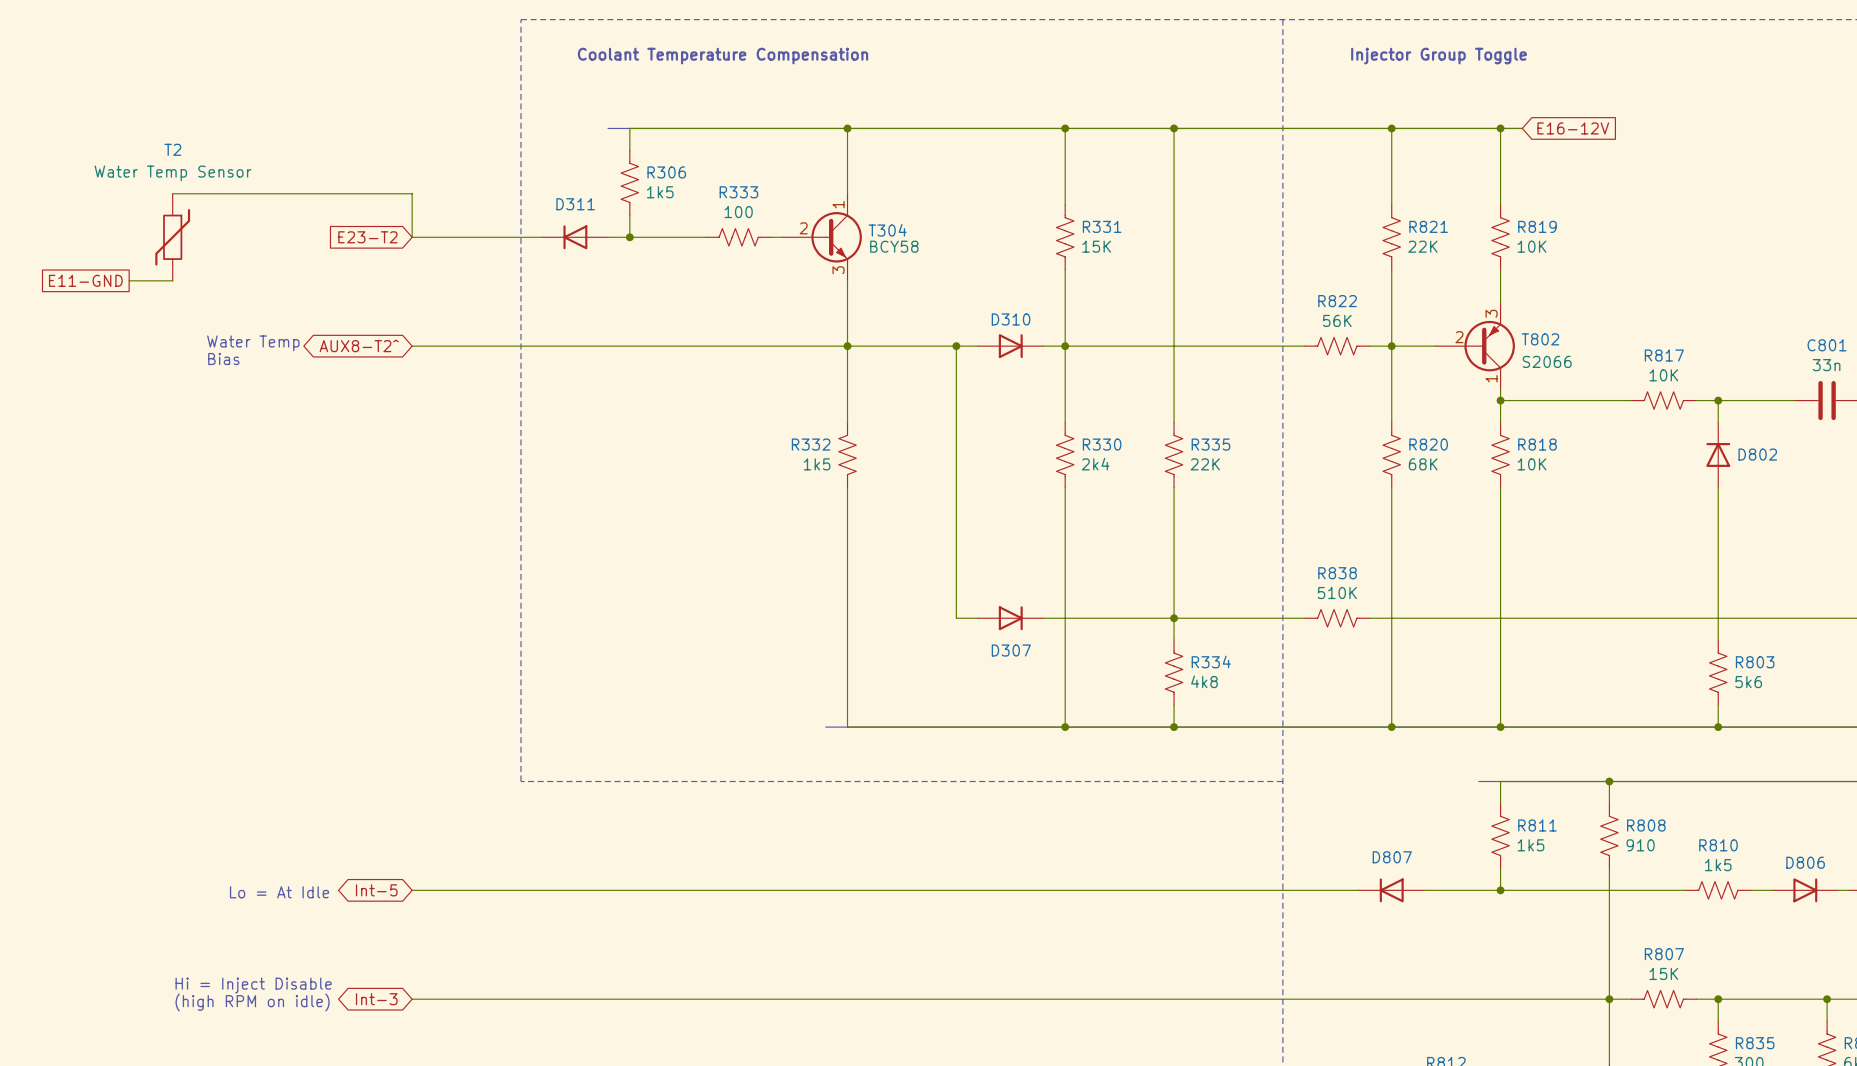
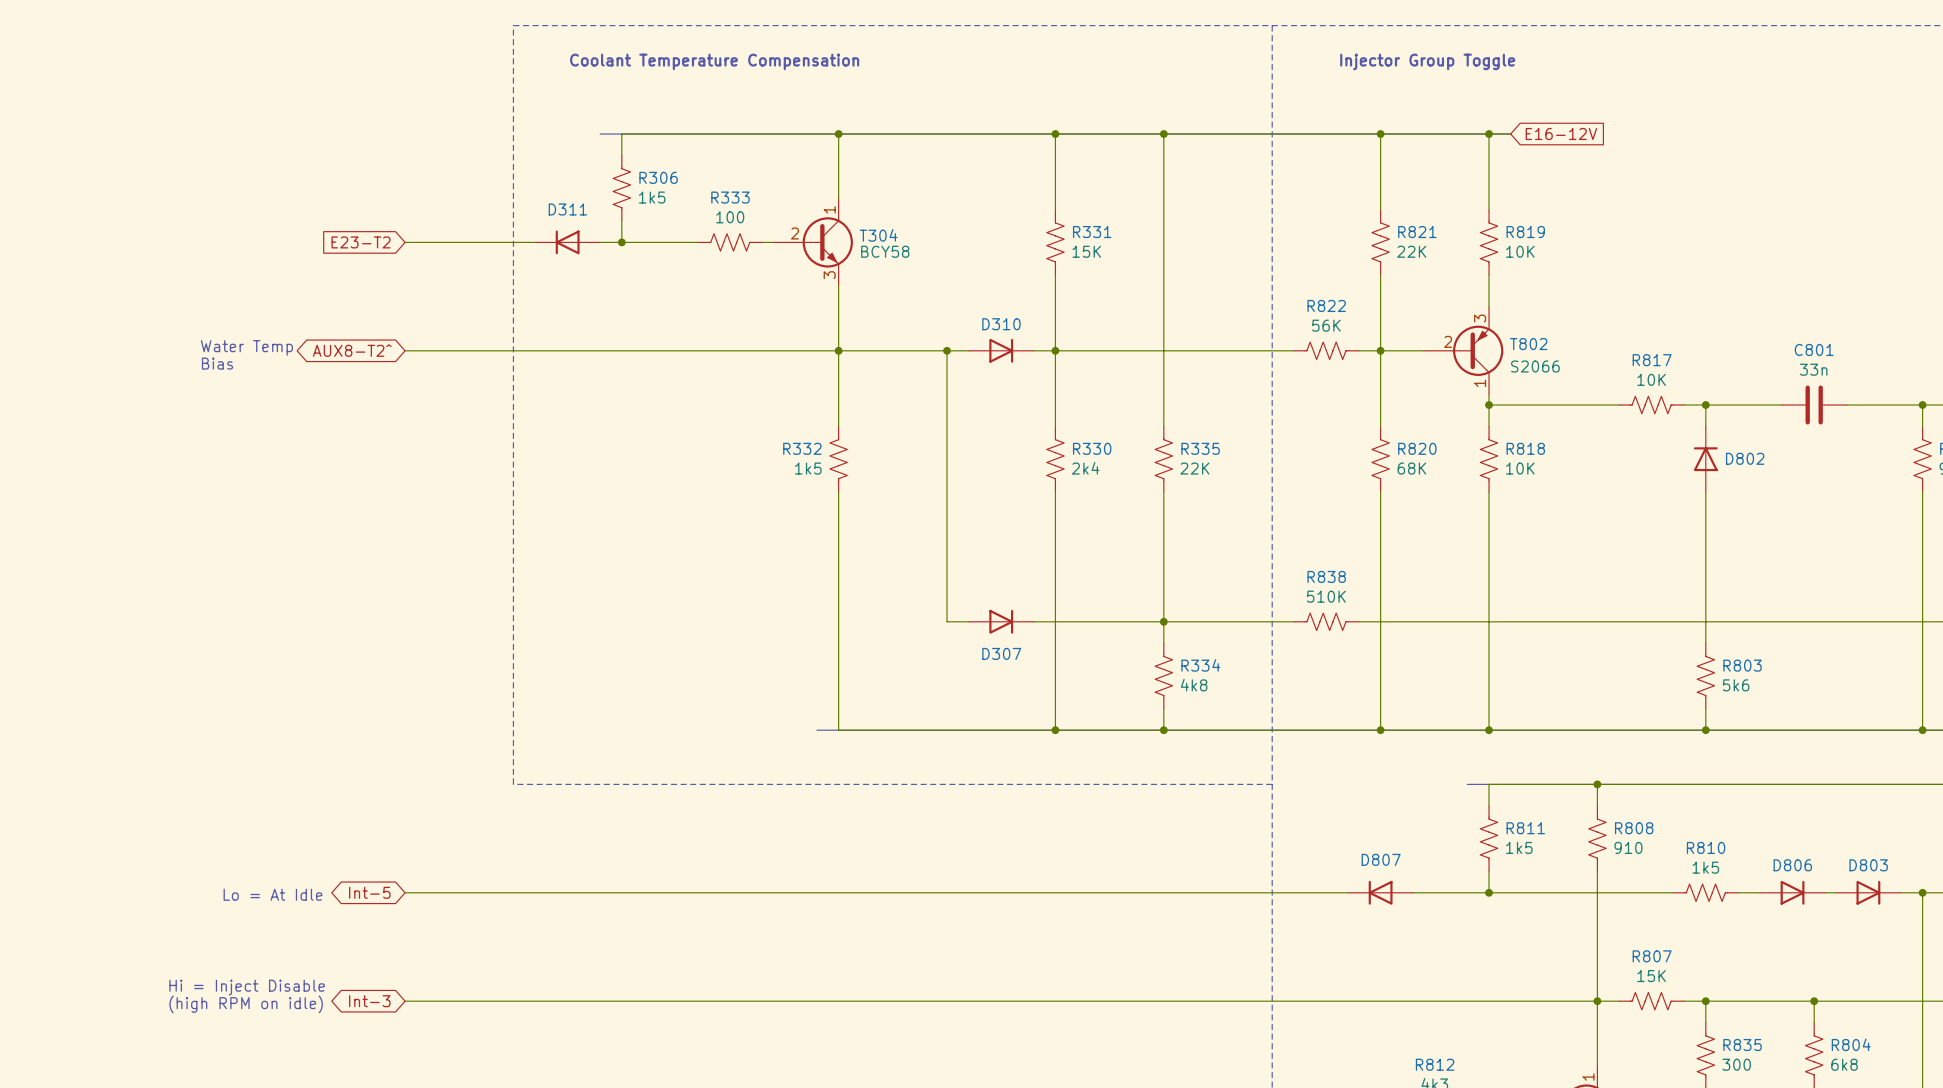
wire: (172, 193) (412, 193) (412, 237) -> none
T2: Water Temp Sensor (172, 237) -> none
global label: E11-GND (85, 280) -> none
wire: (129, 280) (172, 280) -> none

